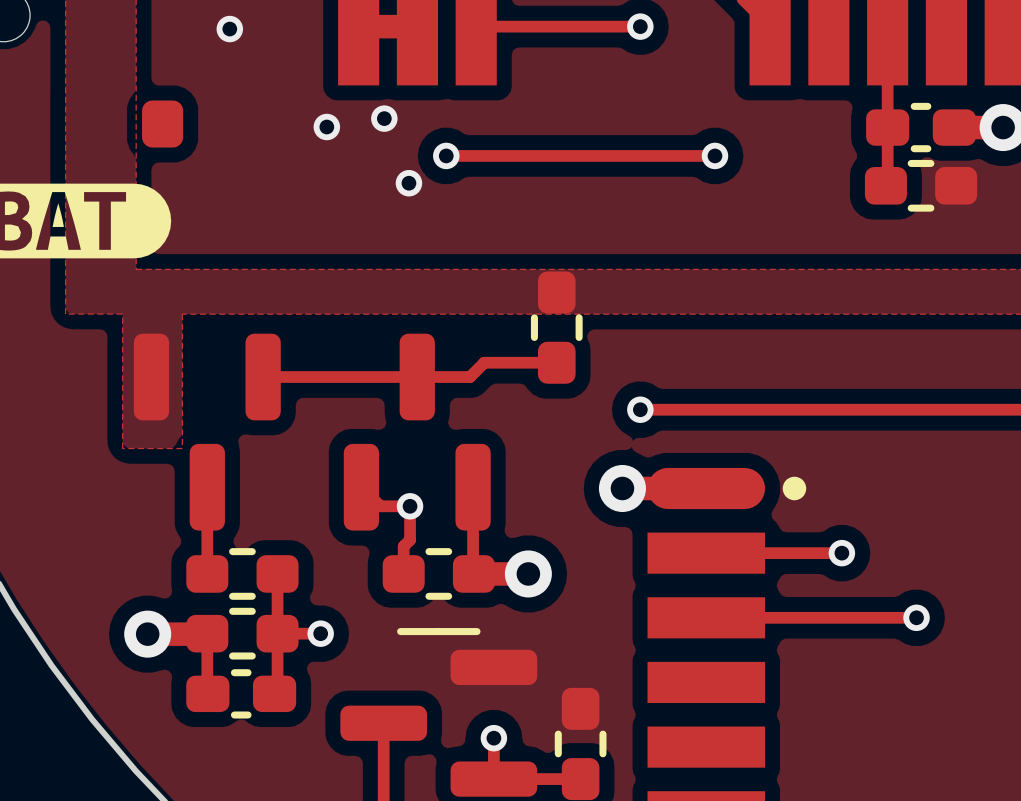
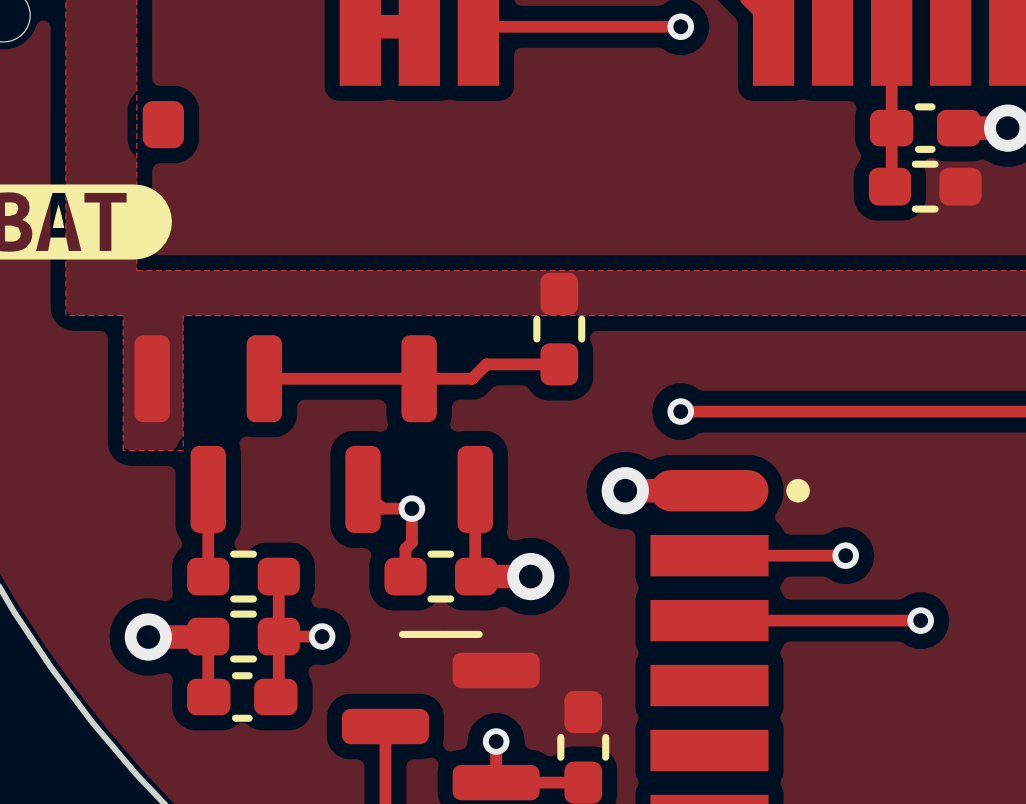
via position: (640, 26) -> (680, 26)
via: (229, 29) -> none
via: (384, 118) -> none
via: (326, 127) -> none
track: (446, 155) (714, 155) -> none
via: (446, 155) -> none
via: (714, 155) -> none
via: (408, 183) -> none
track: (640, 409) (677, 409) -> (643, 26) (680, 26)
via position: (640, 409) -> (680, 411)

